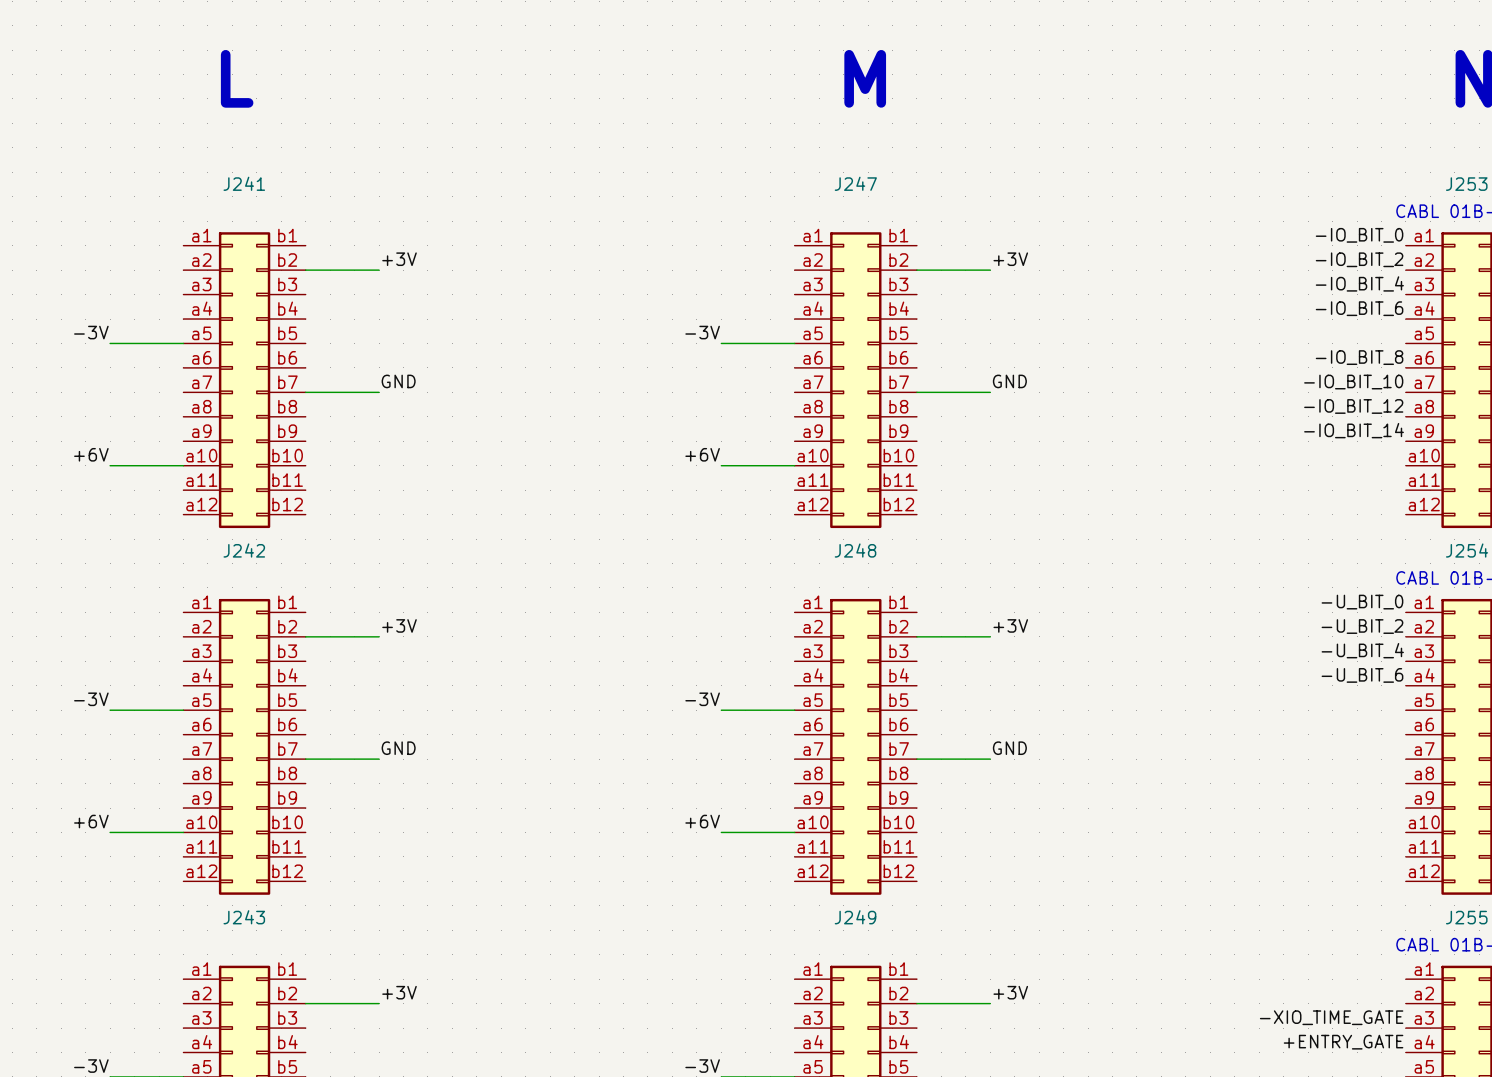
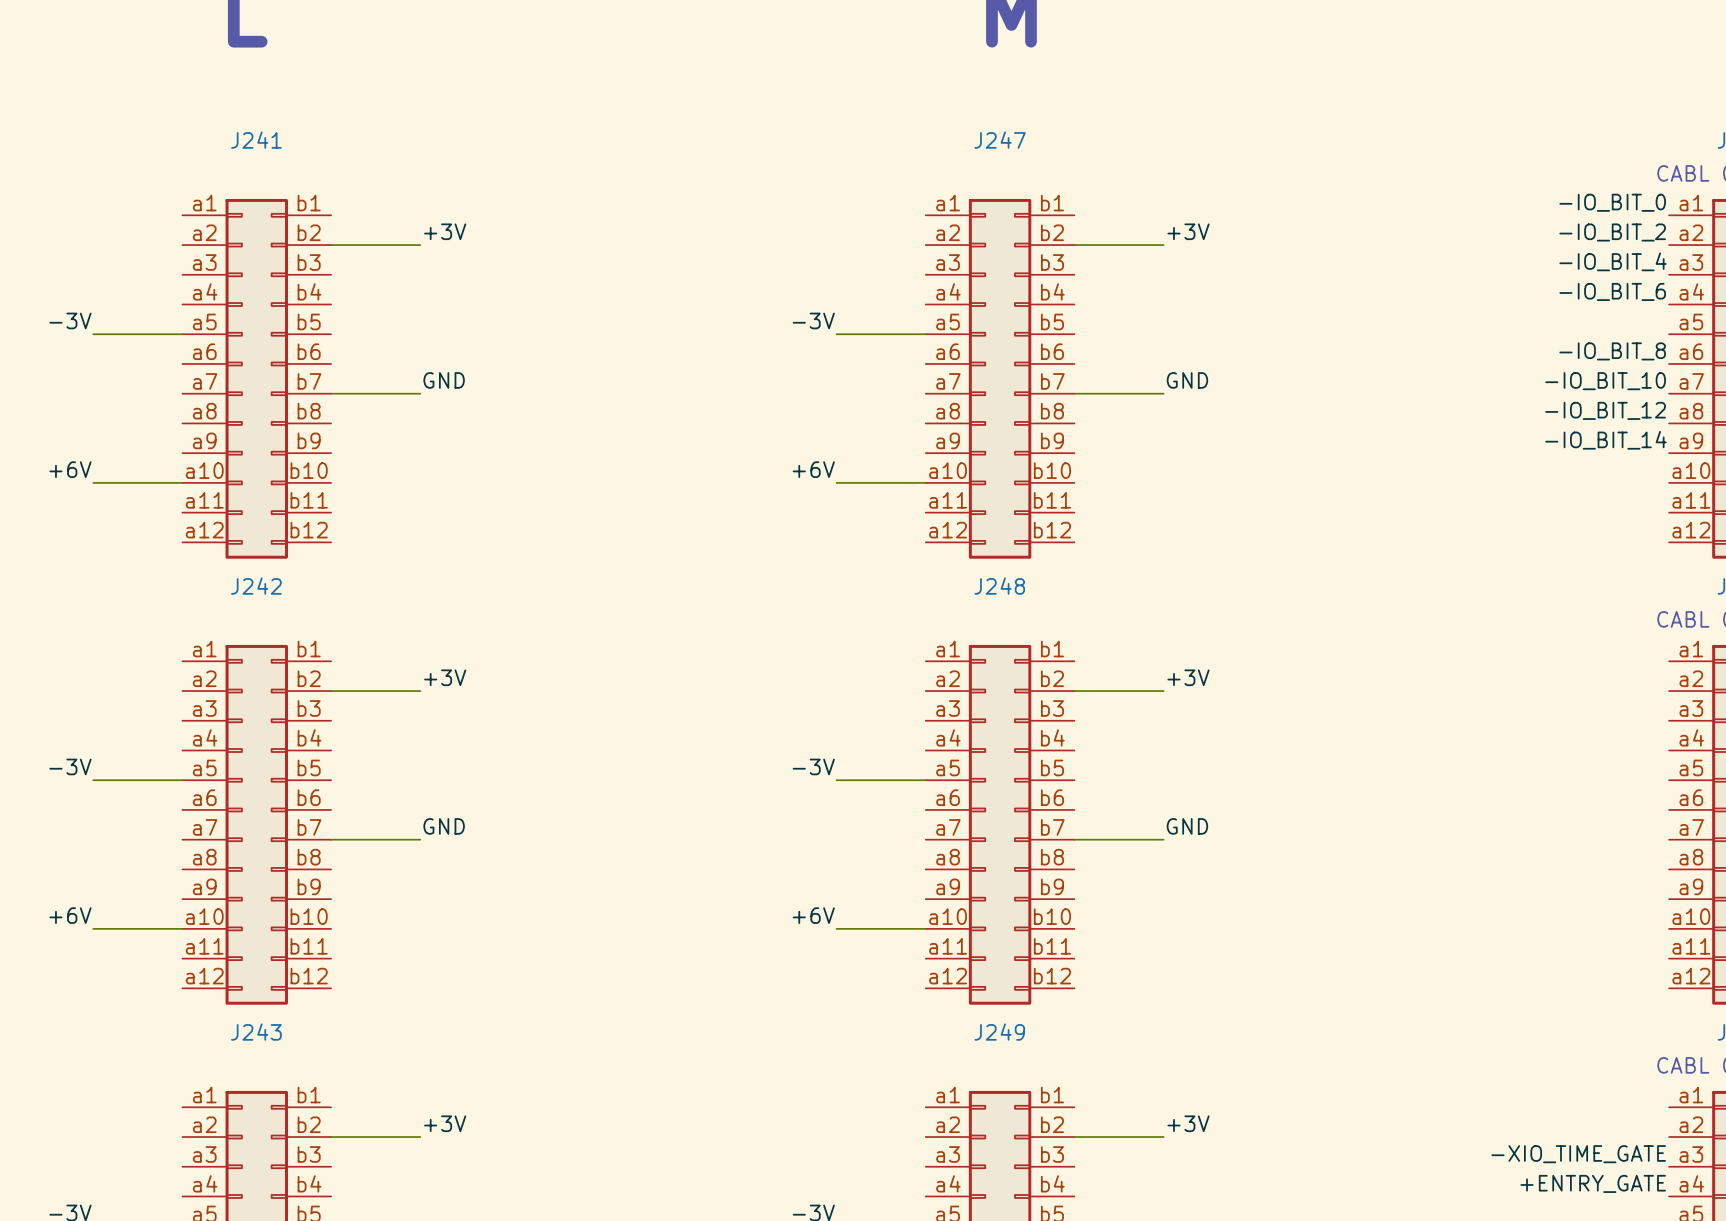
label: -U_BIT_0 (1362, 602) -> none
label: -U_BIT_2 (1362, 626) -> none
label: -U_BIT_4 (1362, 650) -> none
label: -U_BIT_6 (1362, 675) -> none

